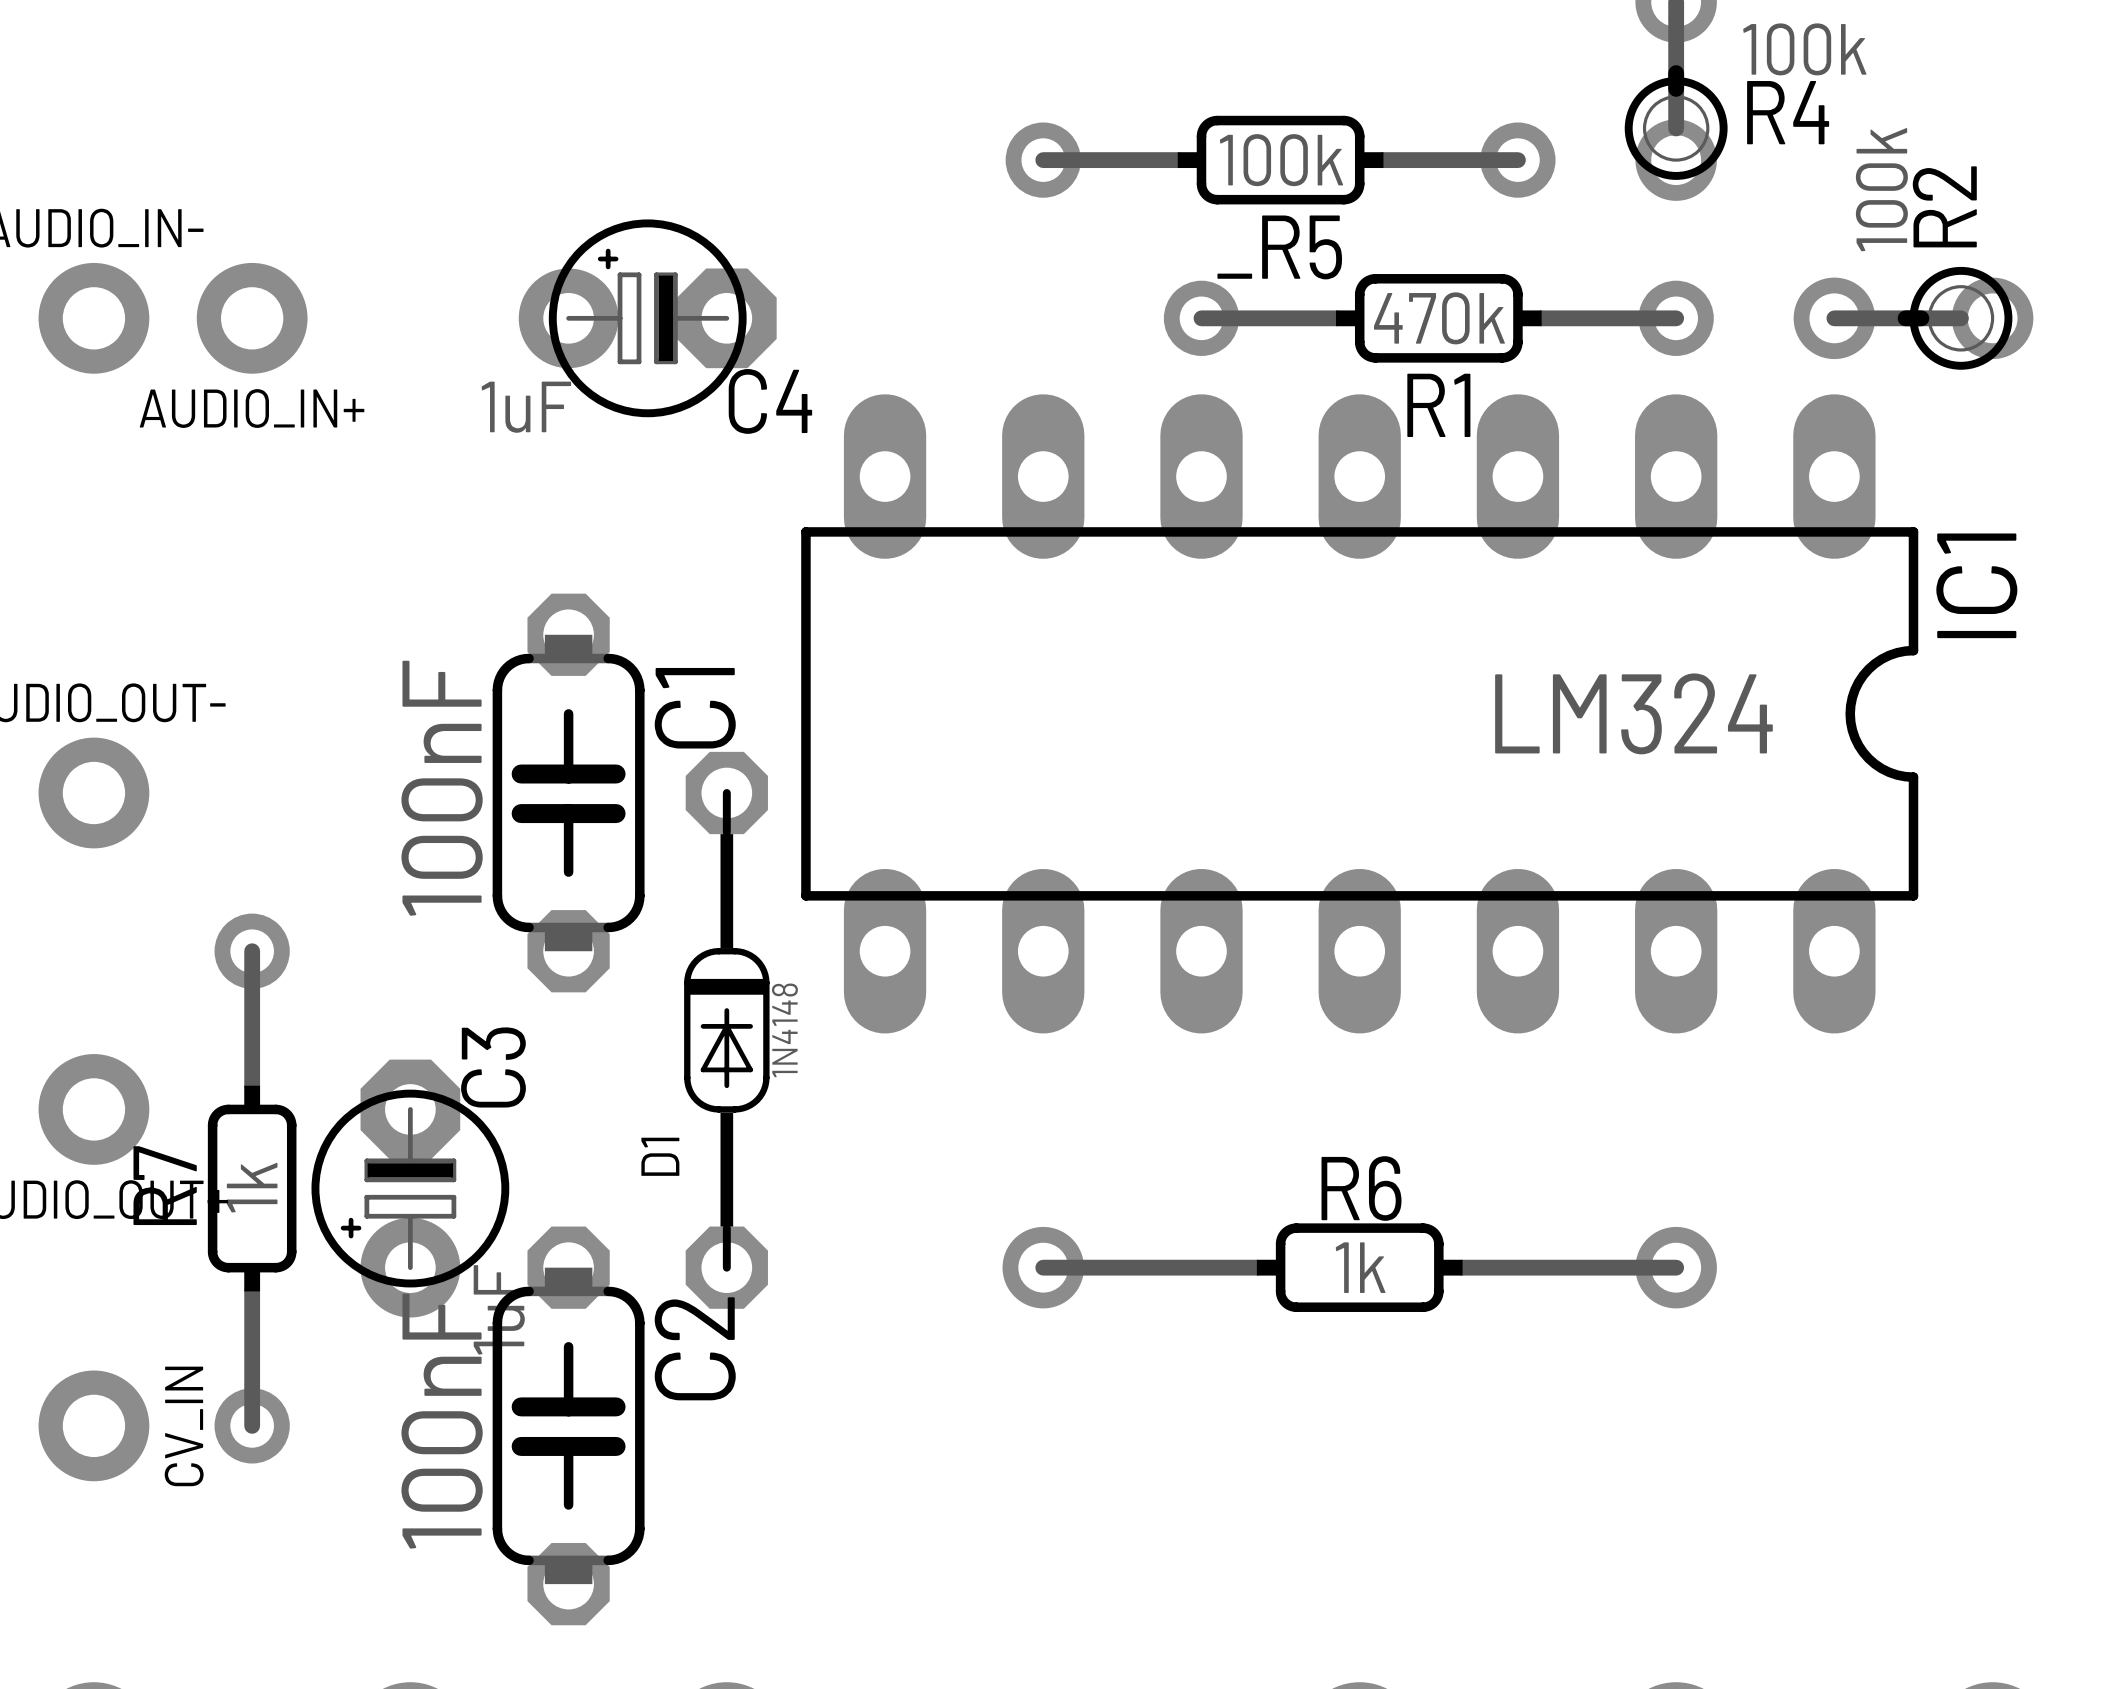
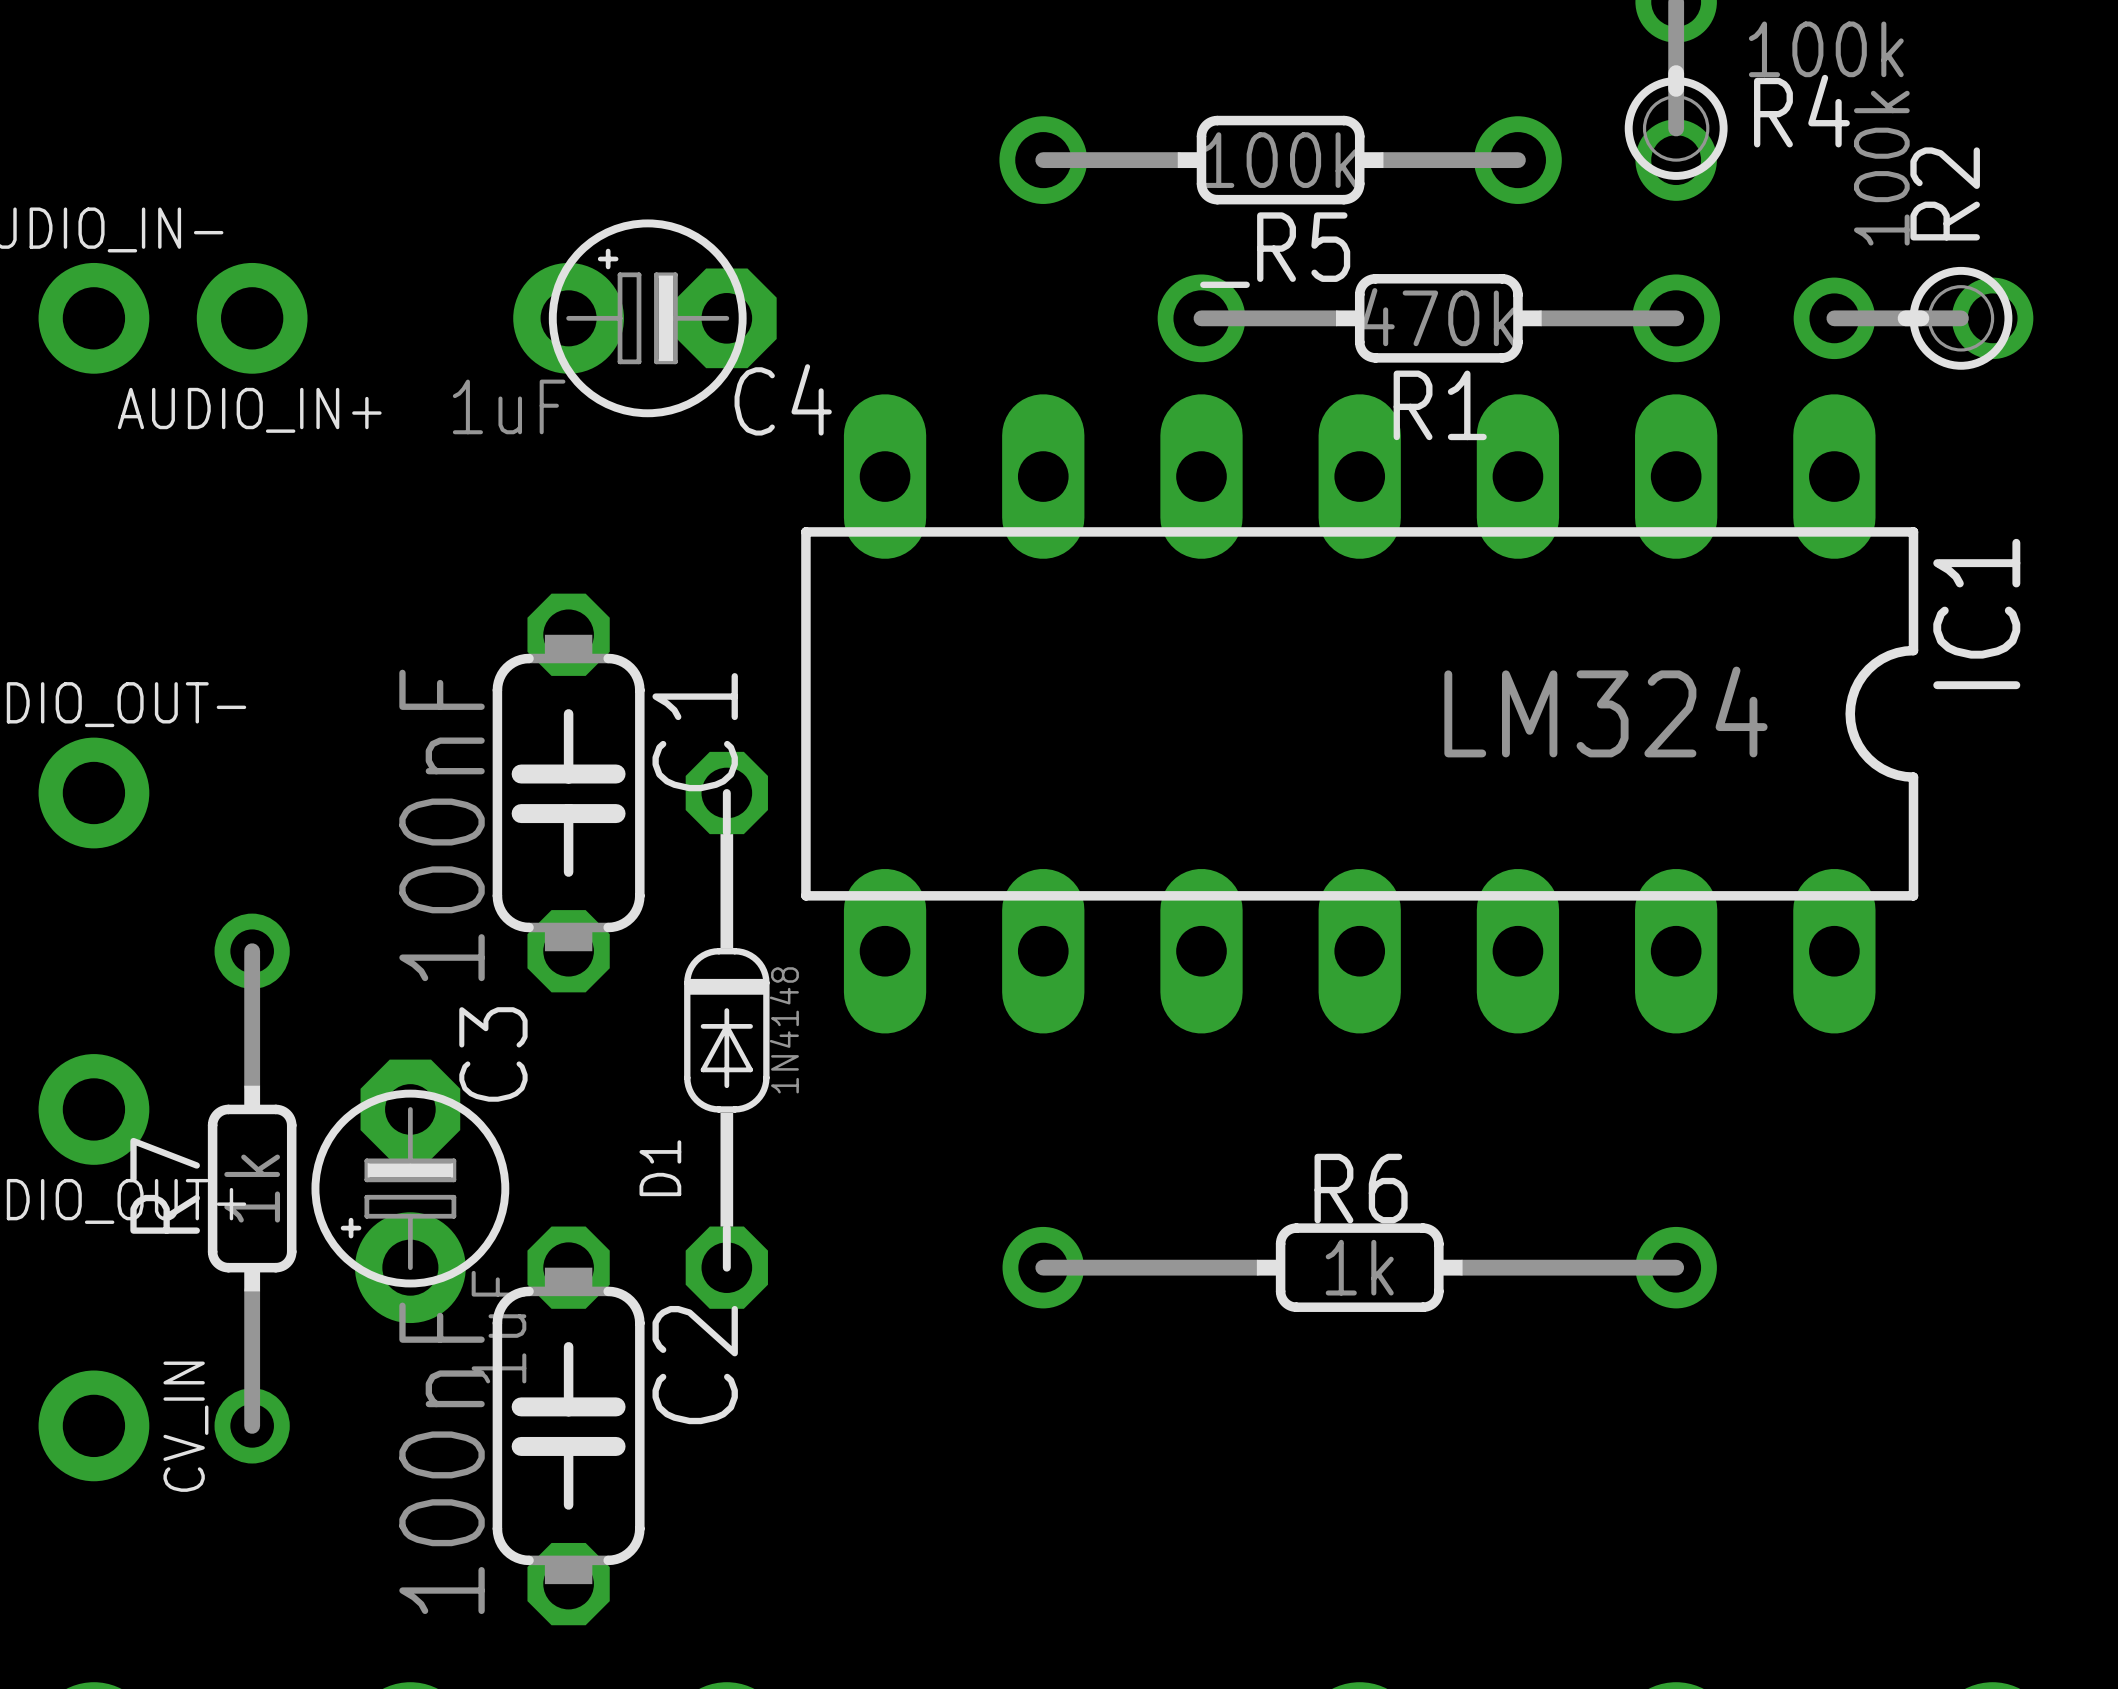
_R5 footprint: [1005, 115, 1556, 205] -> [999, 115, 1562, 205]
C4 footprint: [518, 219, 777, 418] -> [513, 219, 777, 418]
R1 footprint: [1163, 274, 1714, 363] -> [1157, 274, 1721, 363]
C3 footprint: [311, 1059, 510, 1318] -> [311, 1059, 510, 1324]

